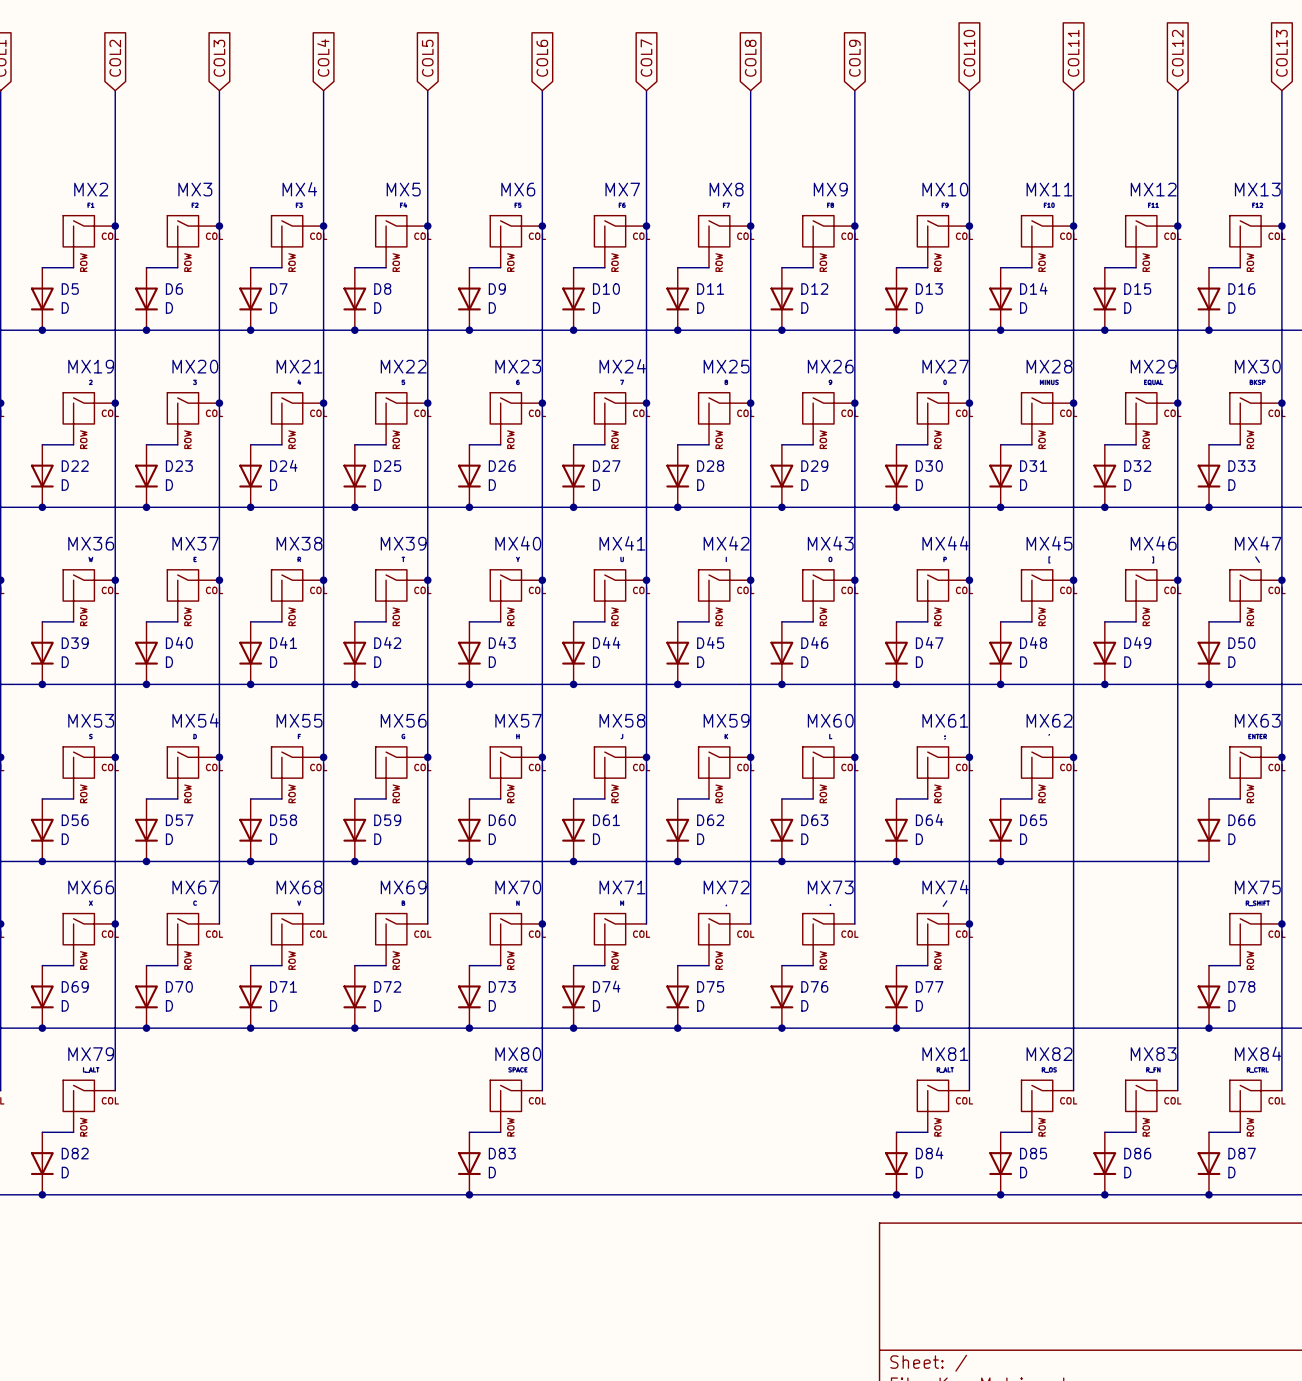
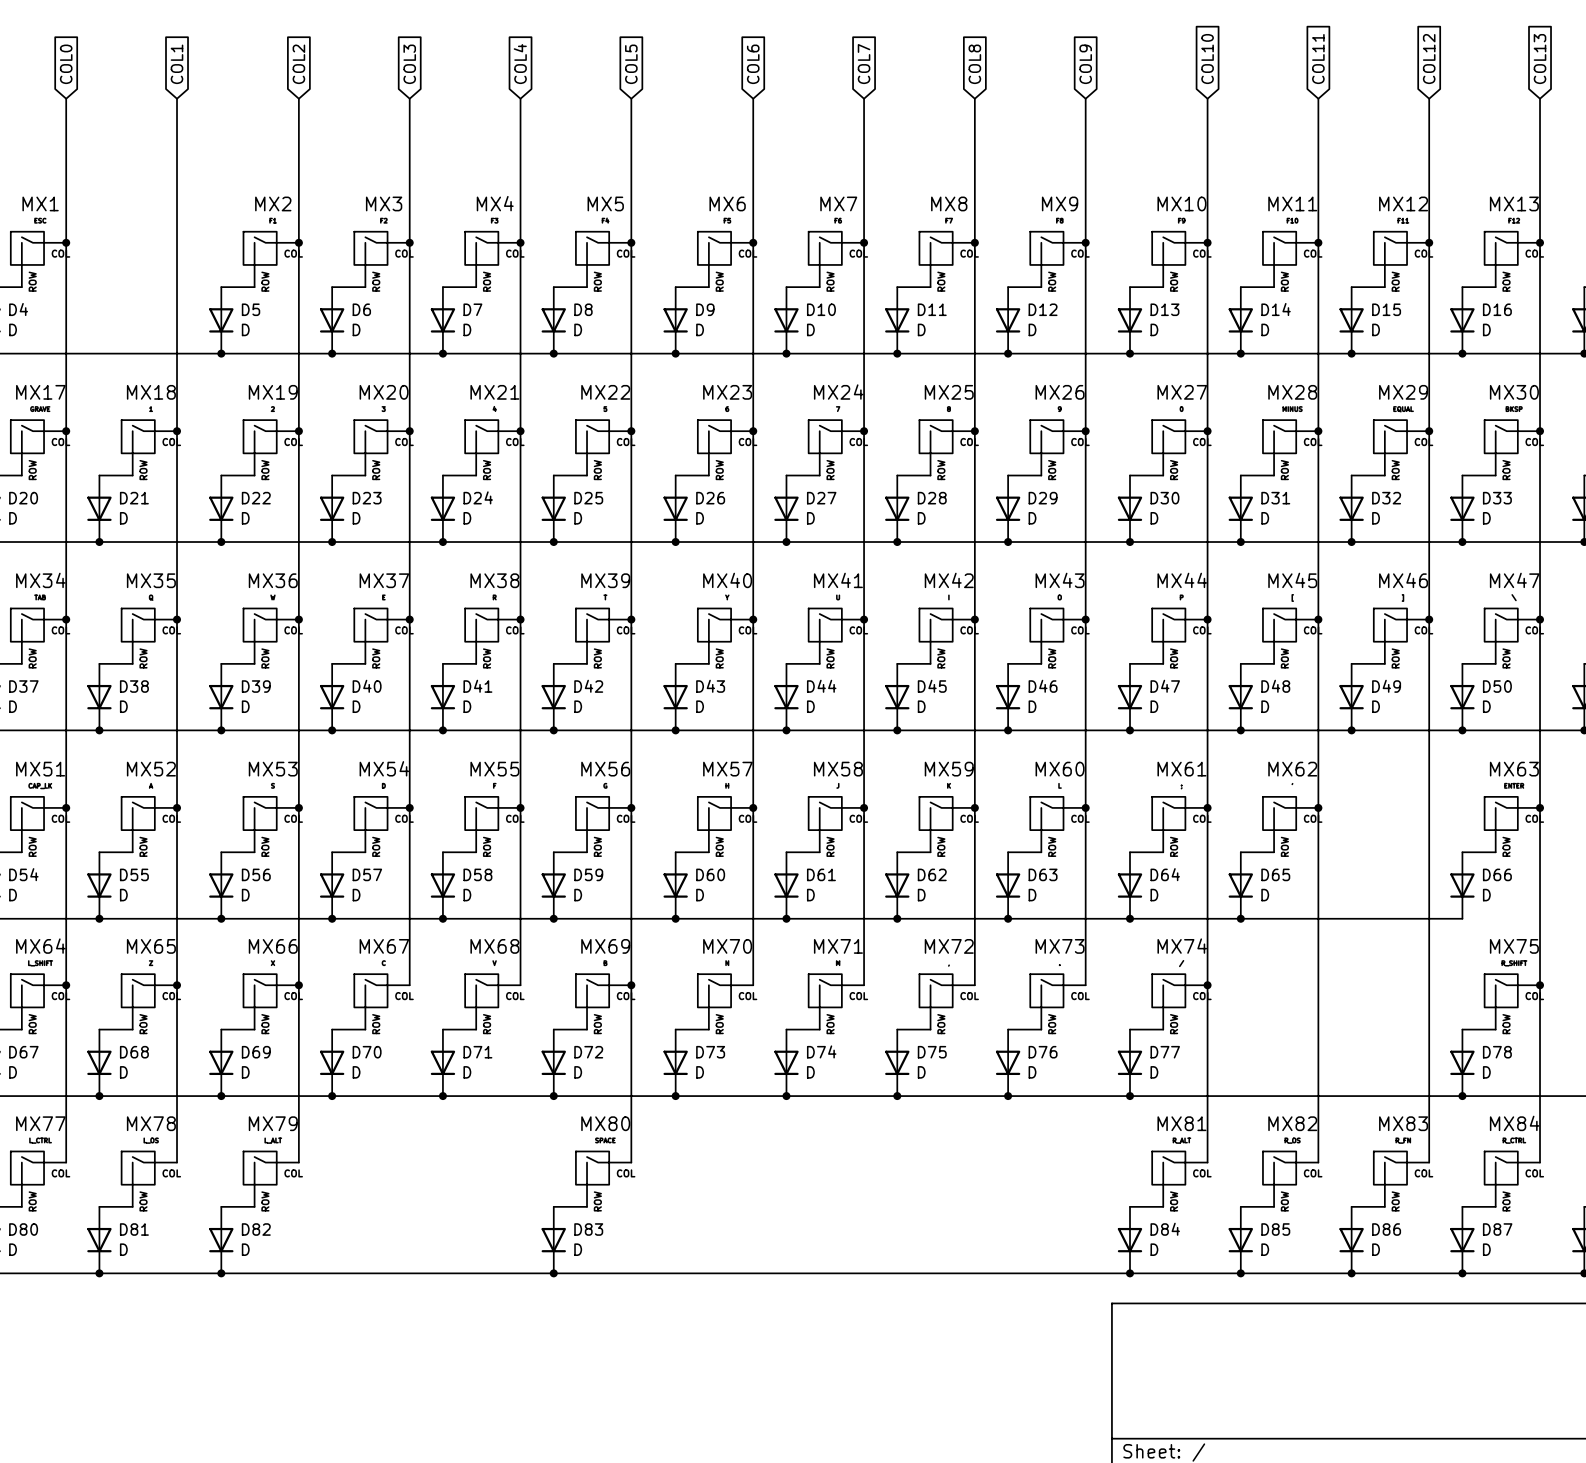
junction: none -> (631, 985)
wire: (542, 923) (542, 1090) -> (631, 985) (631, 1162)
junction: (542, 923) -> none
MX80 position: (516, 1106) -> (603, 1179)
wire: (469, 1132) (500, 1132) -> (553, 1206) (587, 1206)
D83 position: (469, 1163) -> (553, 1240)
junction: none -> (553, 1273)
junction: (469, 1194) -> none

